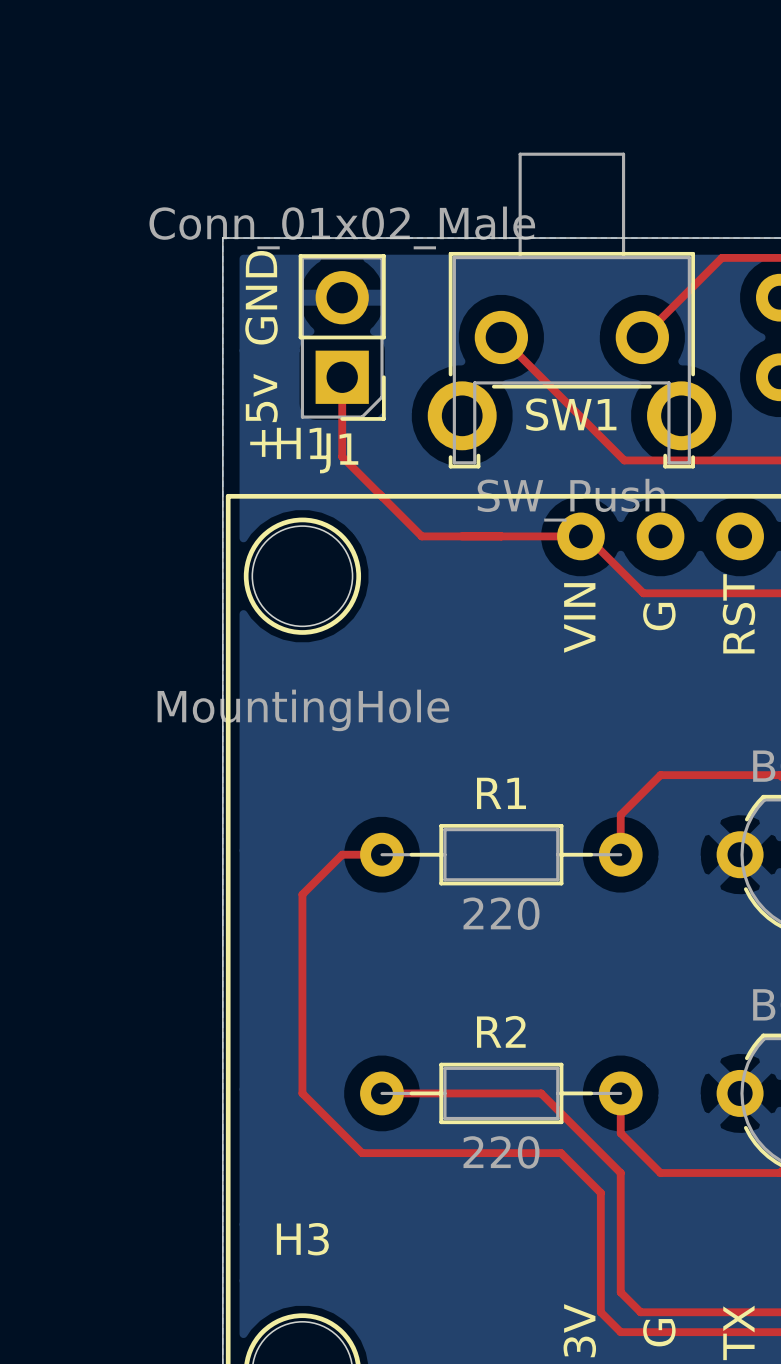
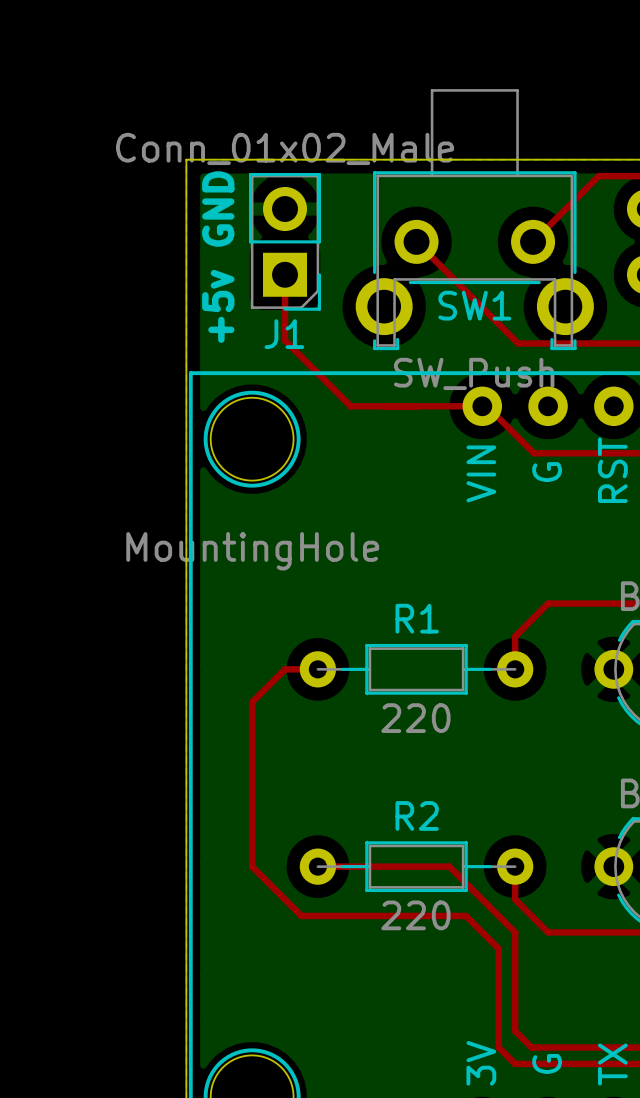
H1 name: H1 (302, 443) -> none
H3 name: H3 (302, 1239) -> none

